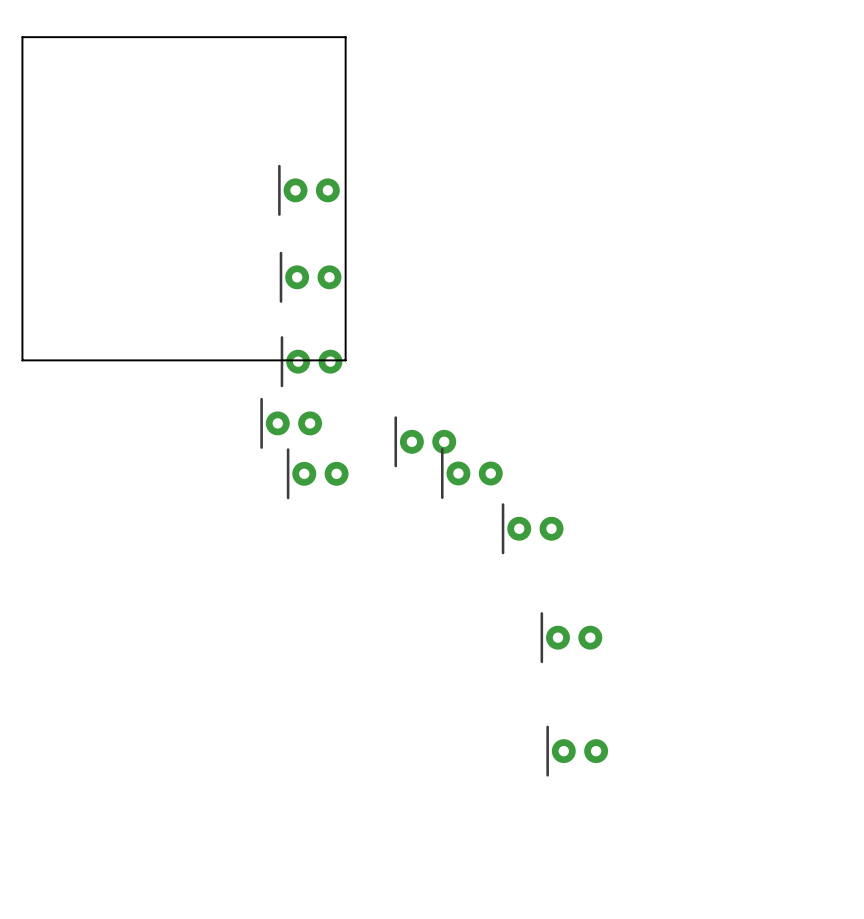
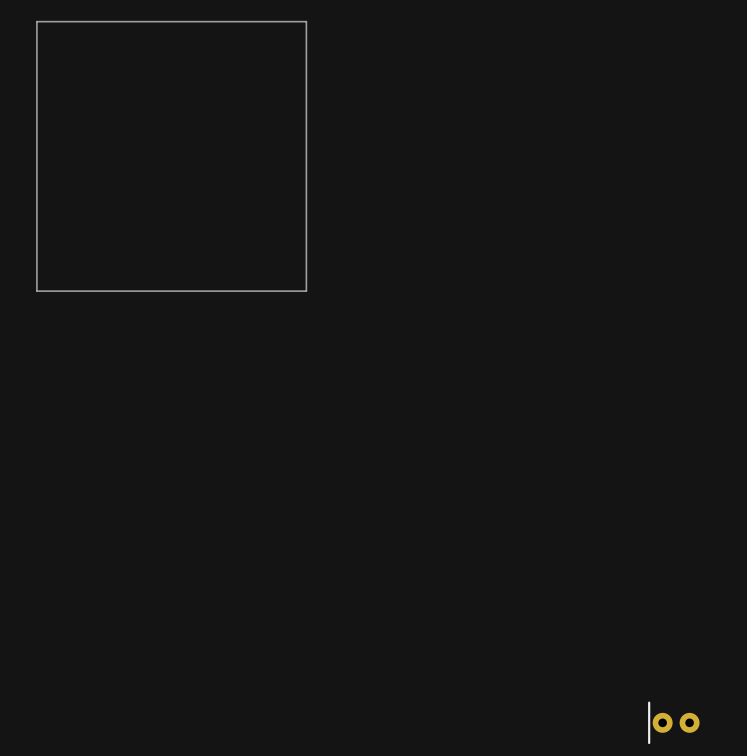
part: (308, 190) -> none
part: (310, 277) -> none
part: (311, 361) -> none
part: (291, 423) -> none
part: (425, 441) -> none
part: (317, 473) -> none
part: (471, 473) -> none
part: (532, 528) -> none
part: (571, 637) -> none
part: (577, 751) -> none
part: none -> (673, 722)

